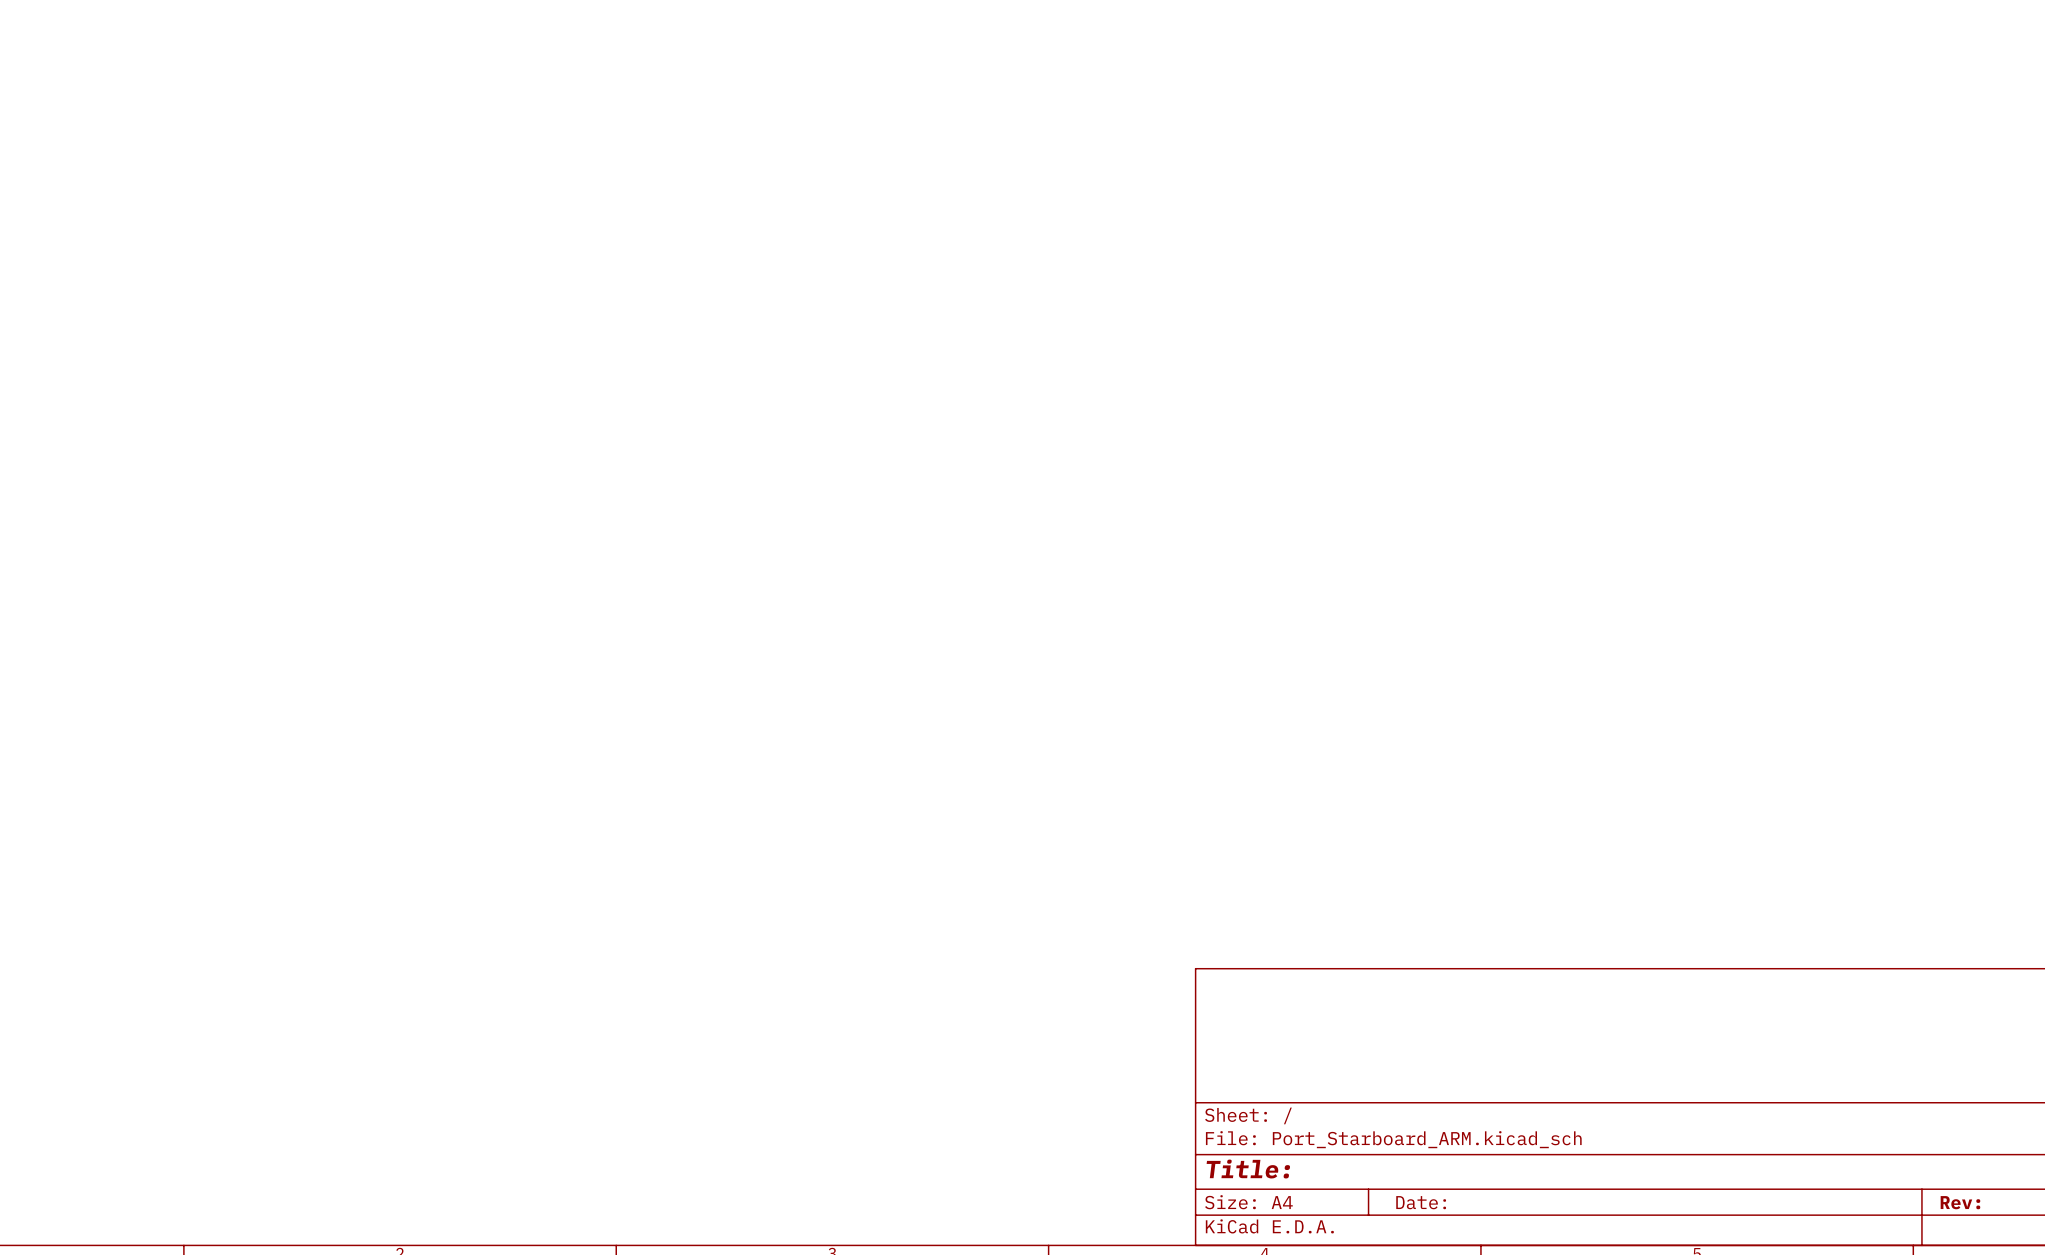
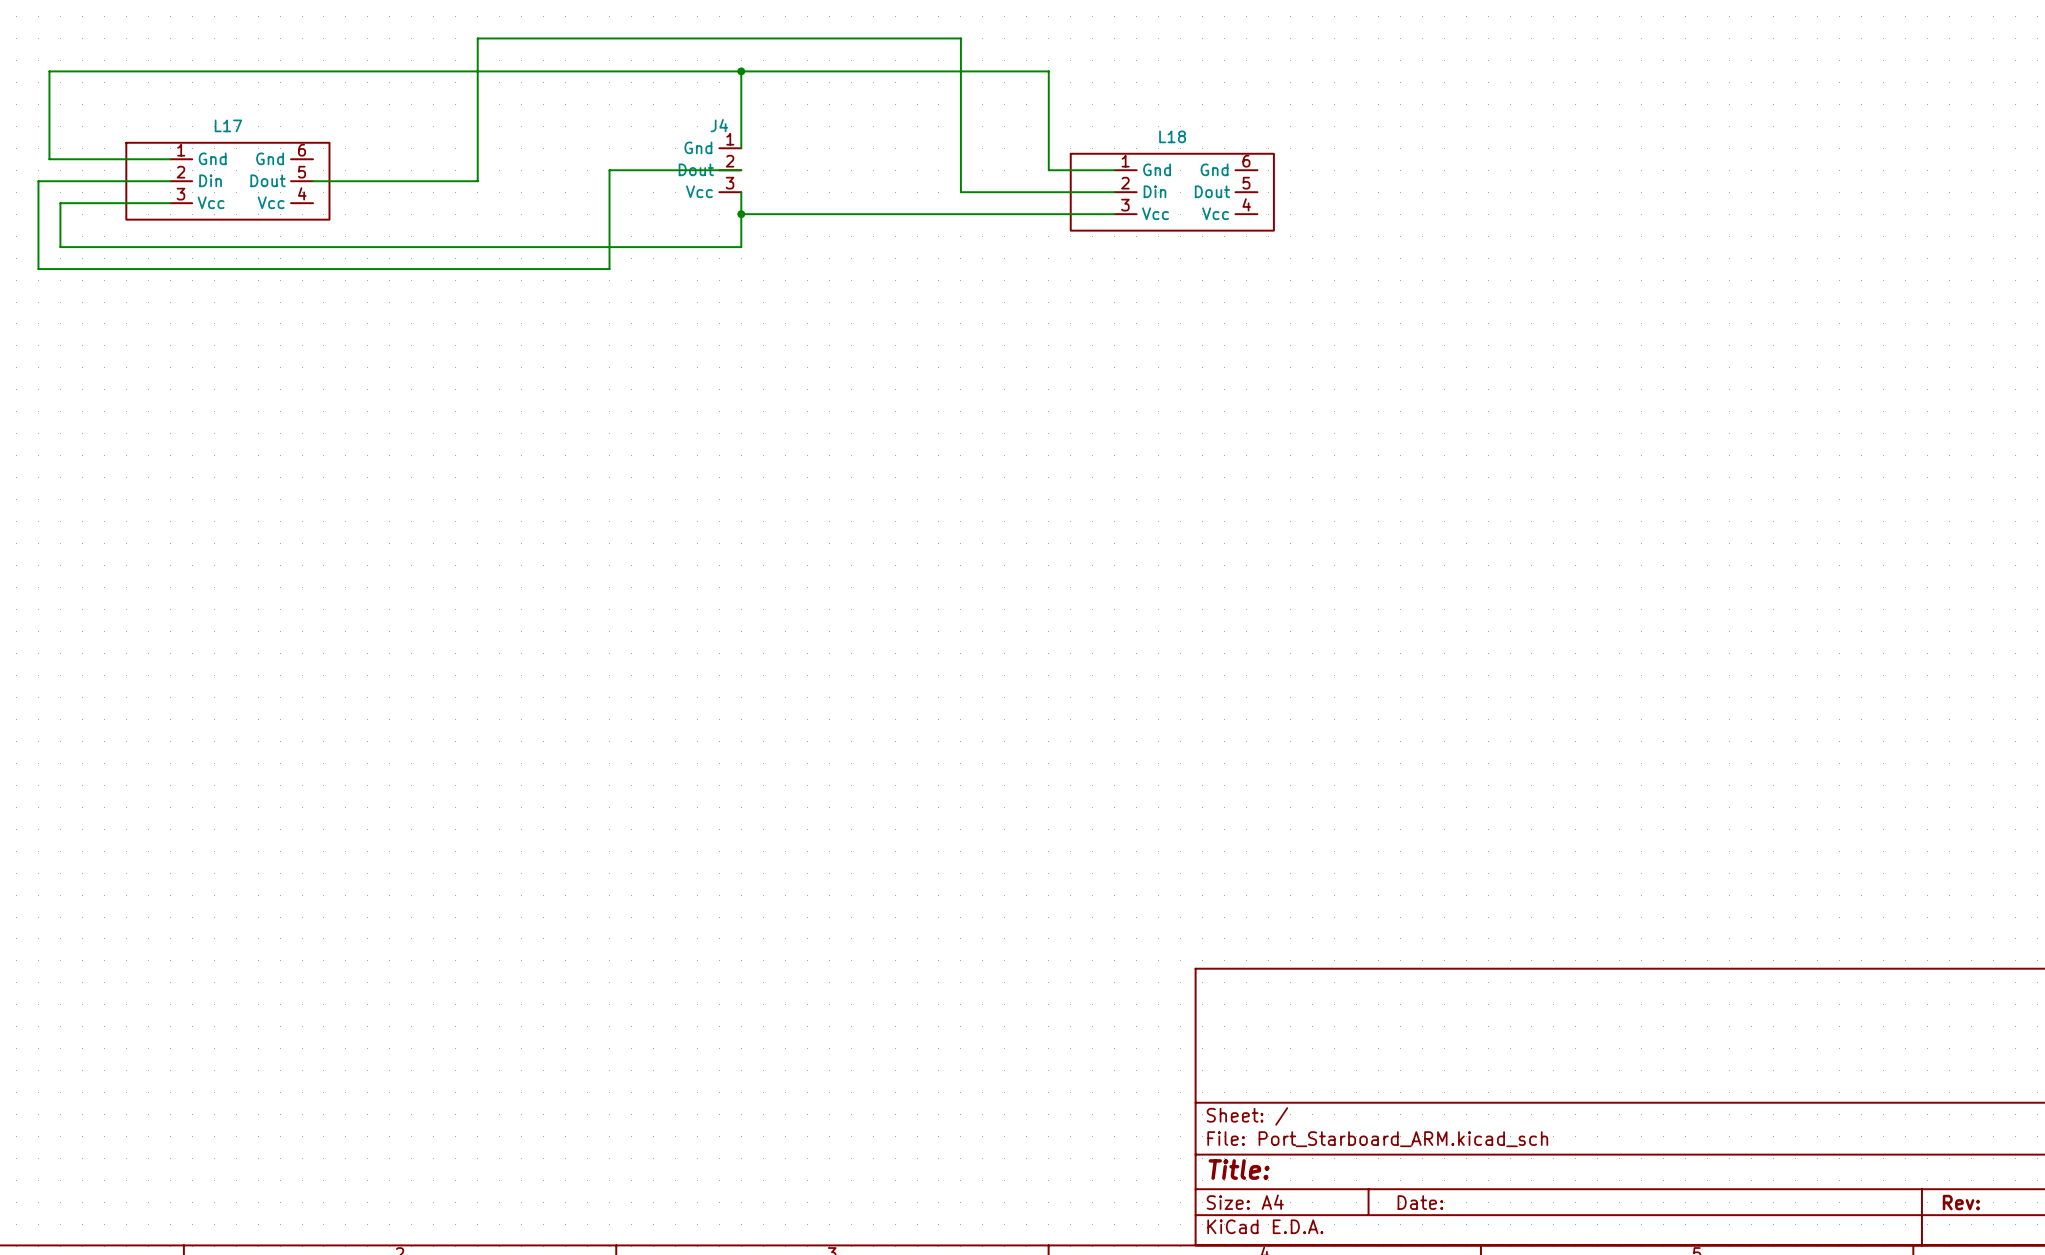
wire: none -> (741, 71) (741, 148)
junction: none -> (741, 71)
wire: none -> (170, 159) (49, 159) (49, 71) (1048, 71) (1048, 170) (1114, 170)
J4: none -> (730, 170)
wire: none -> (741, 170) (609, 170) (609, 269) (38, 269) (38, 181) (170, 181)
L17: none -> (227, 181)
wire: none -> (313, 181) (477, 181) (477, 38) (960, 38) (960, 192) (1114, 192)
wire: none -> (741, 192) (741, 247) (60, 247) (60, 203) (170, 203)
L18: none -> (1172, 192)
wire: none -> (741, 214) (1114, 214)
junction: none -> (741, 214)

